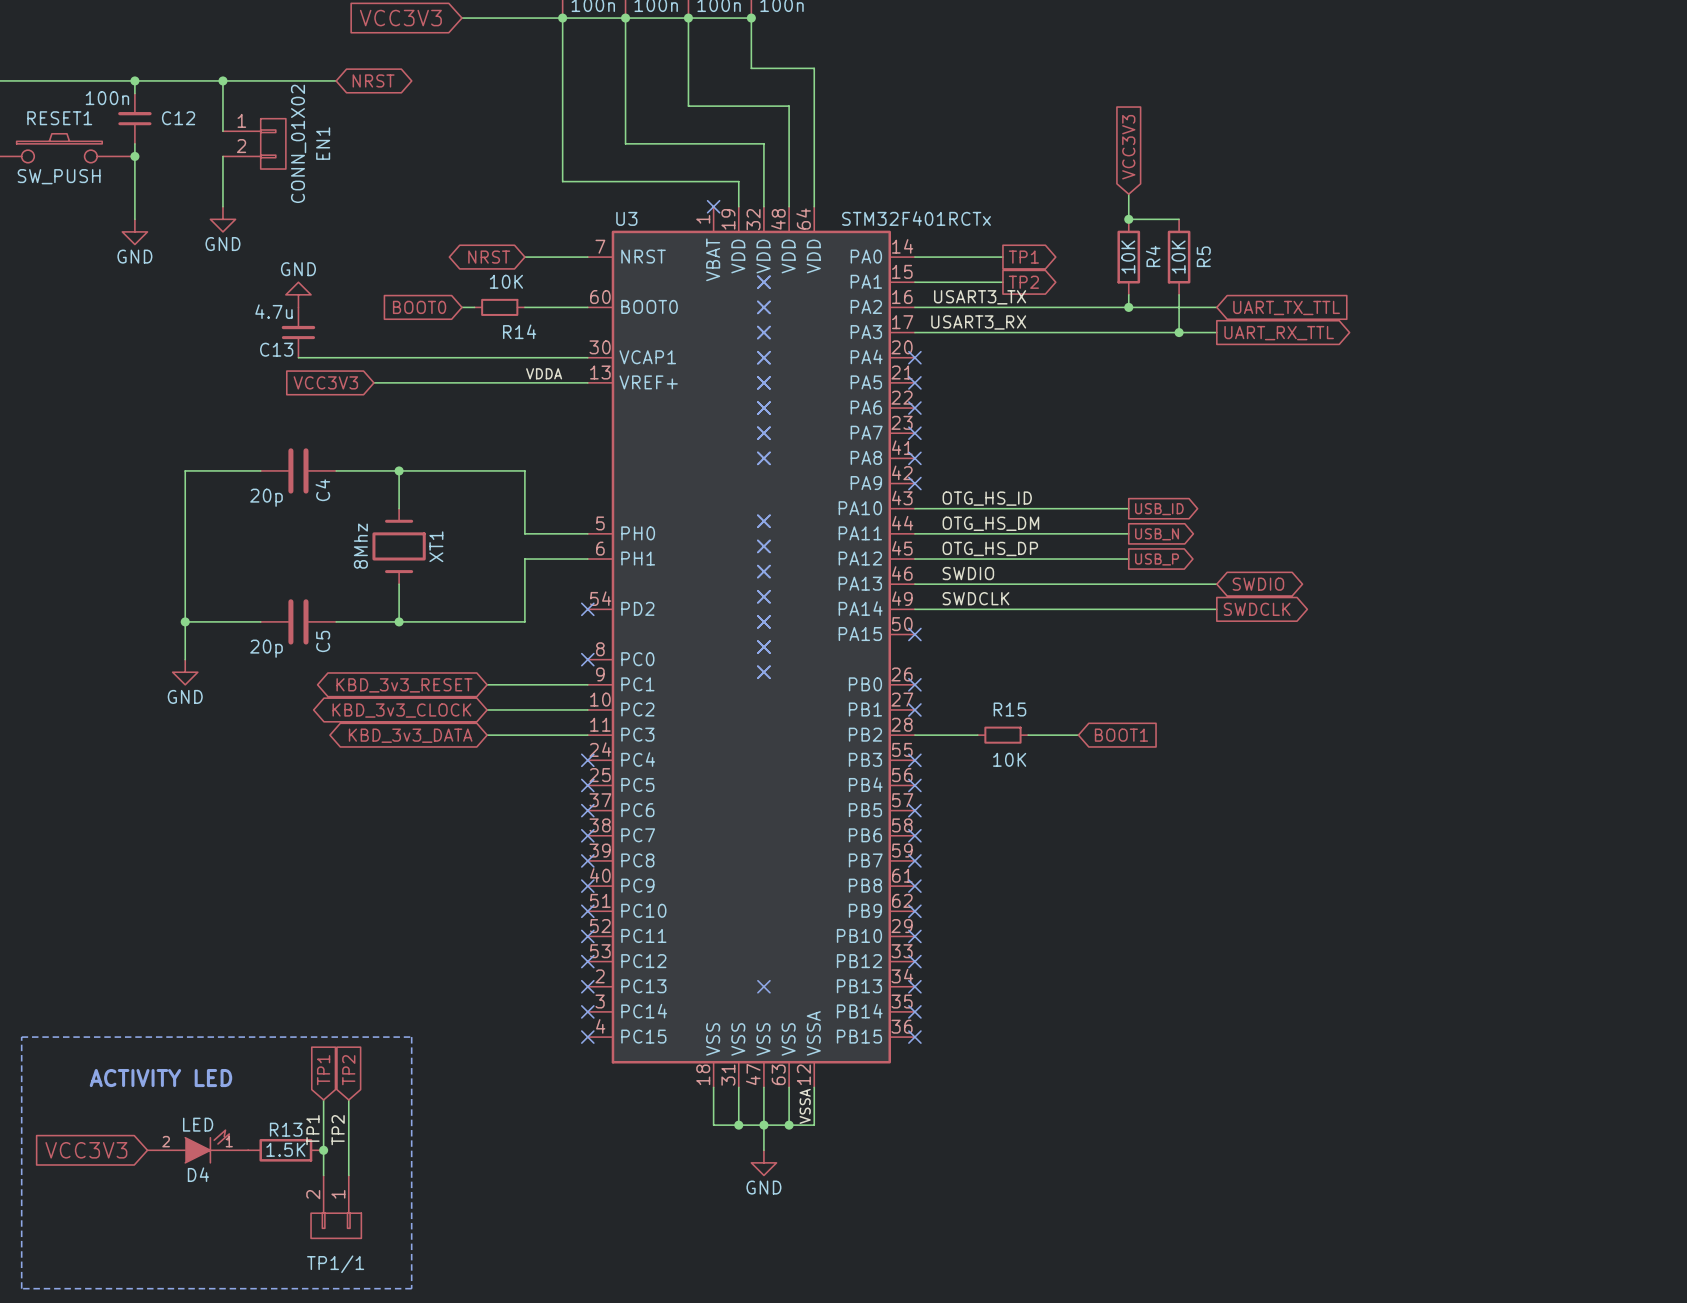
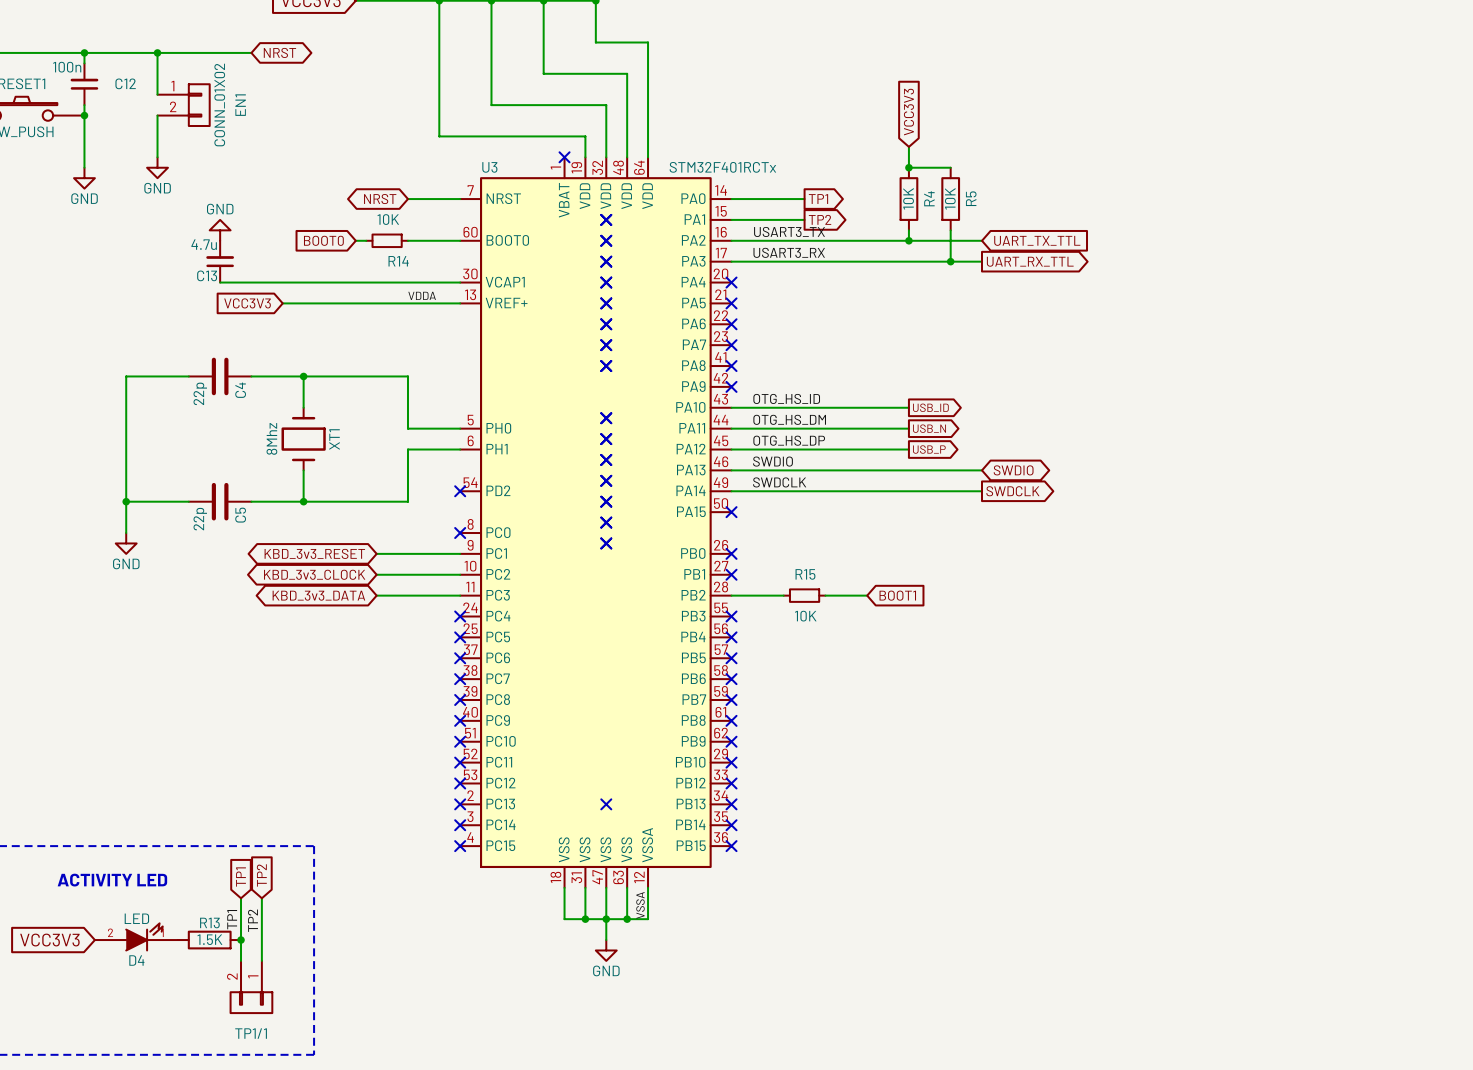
C4 value: 20p (266, 497) -> 22p (200, 393)
C5 value: 20p (266, 648) -> 22p (200, 519)

